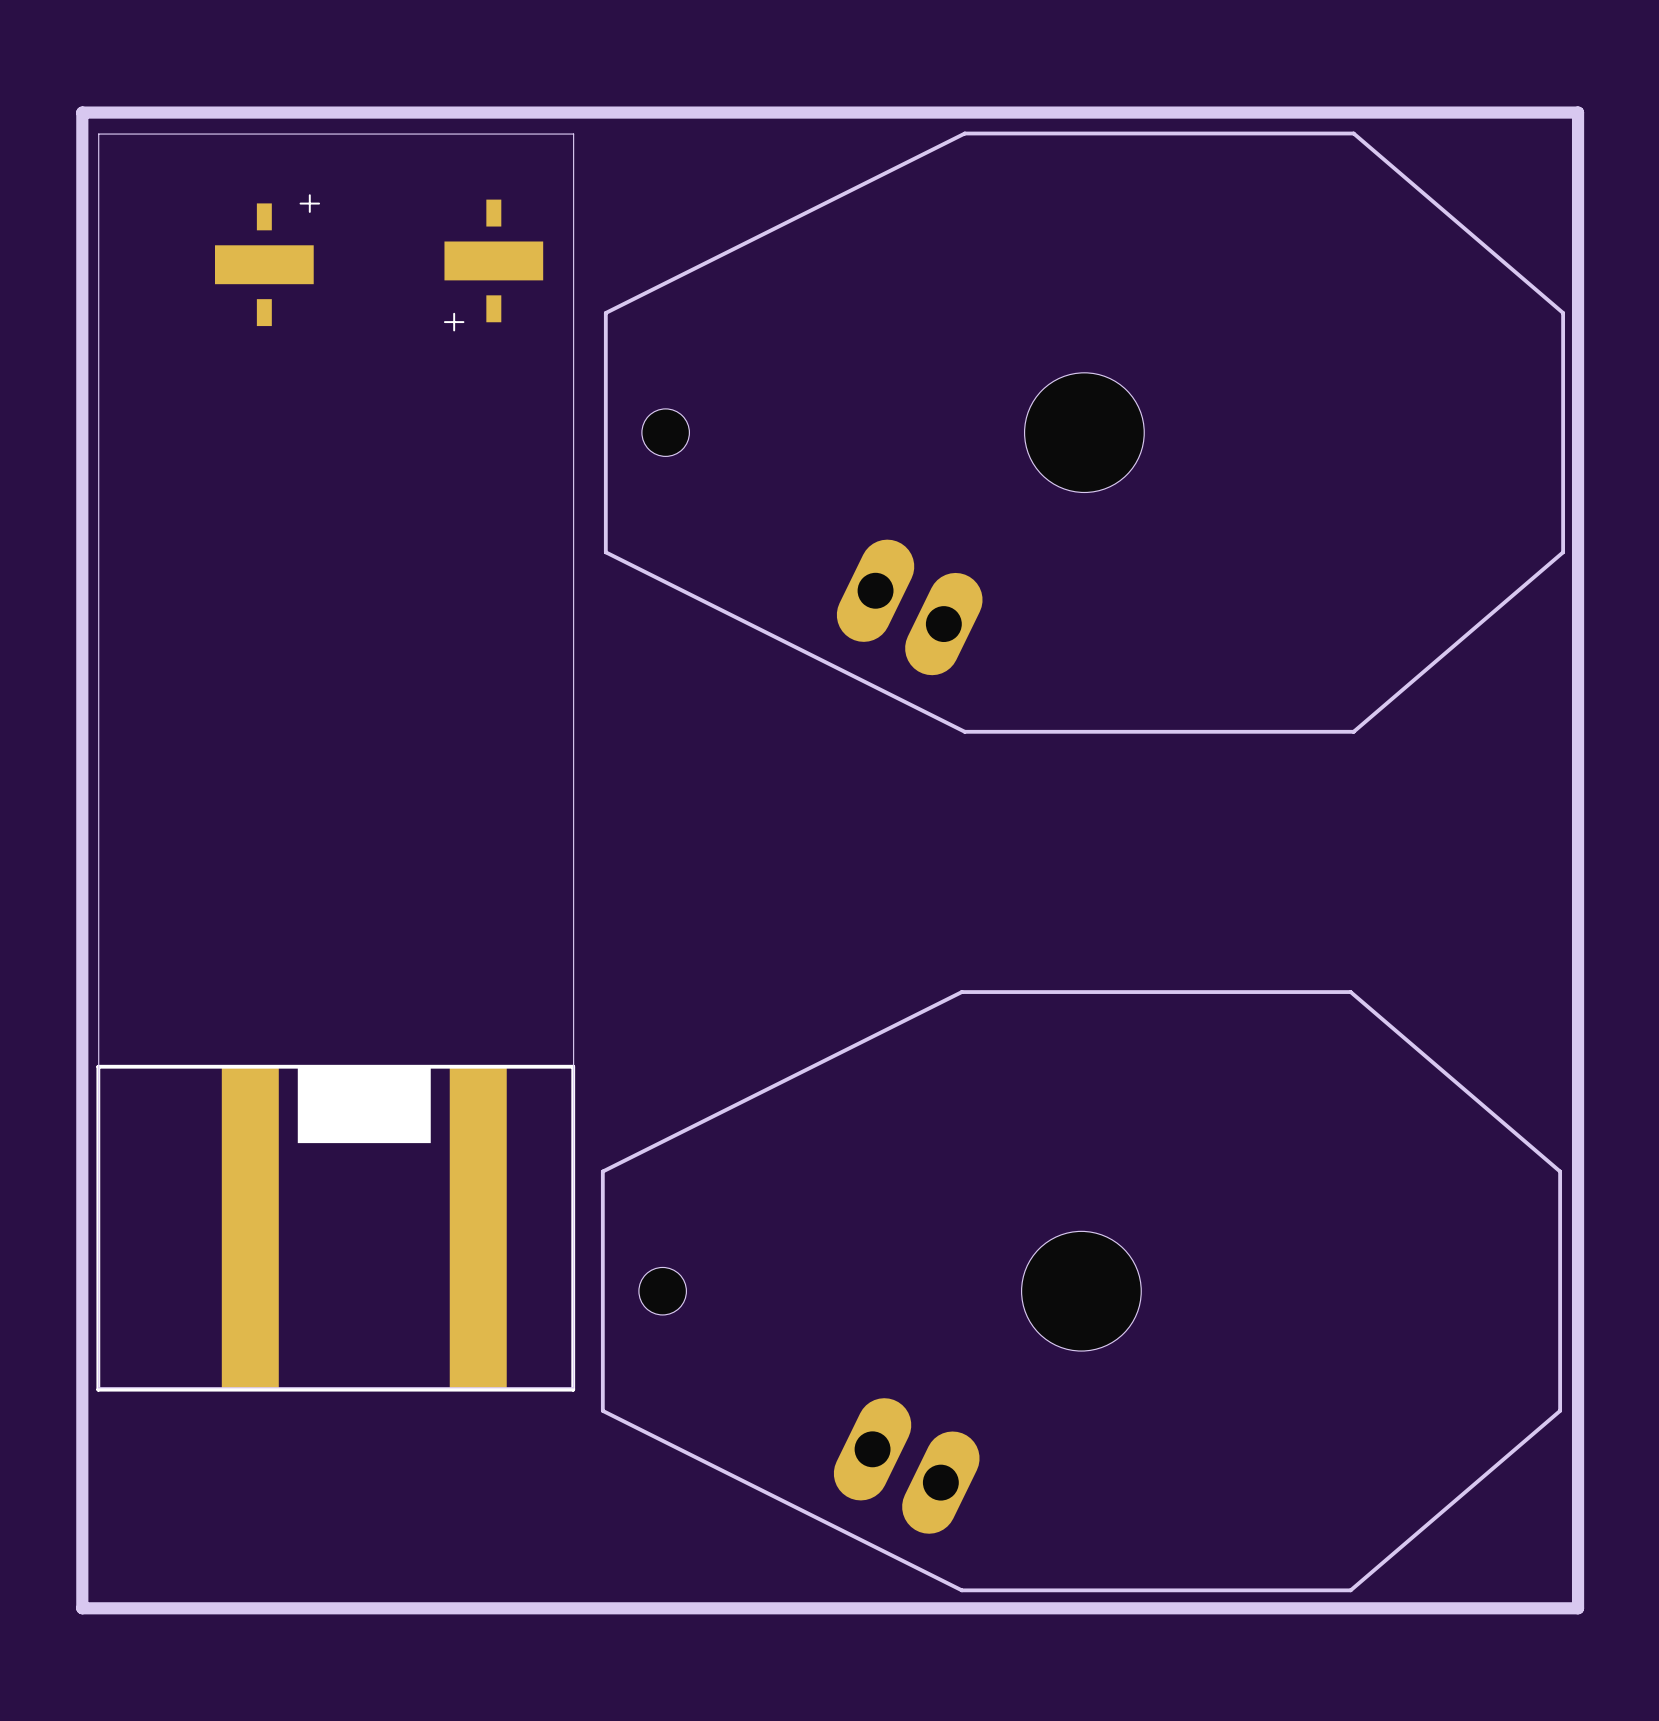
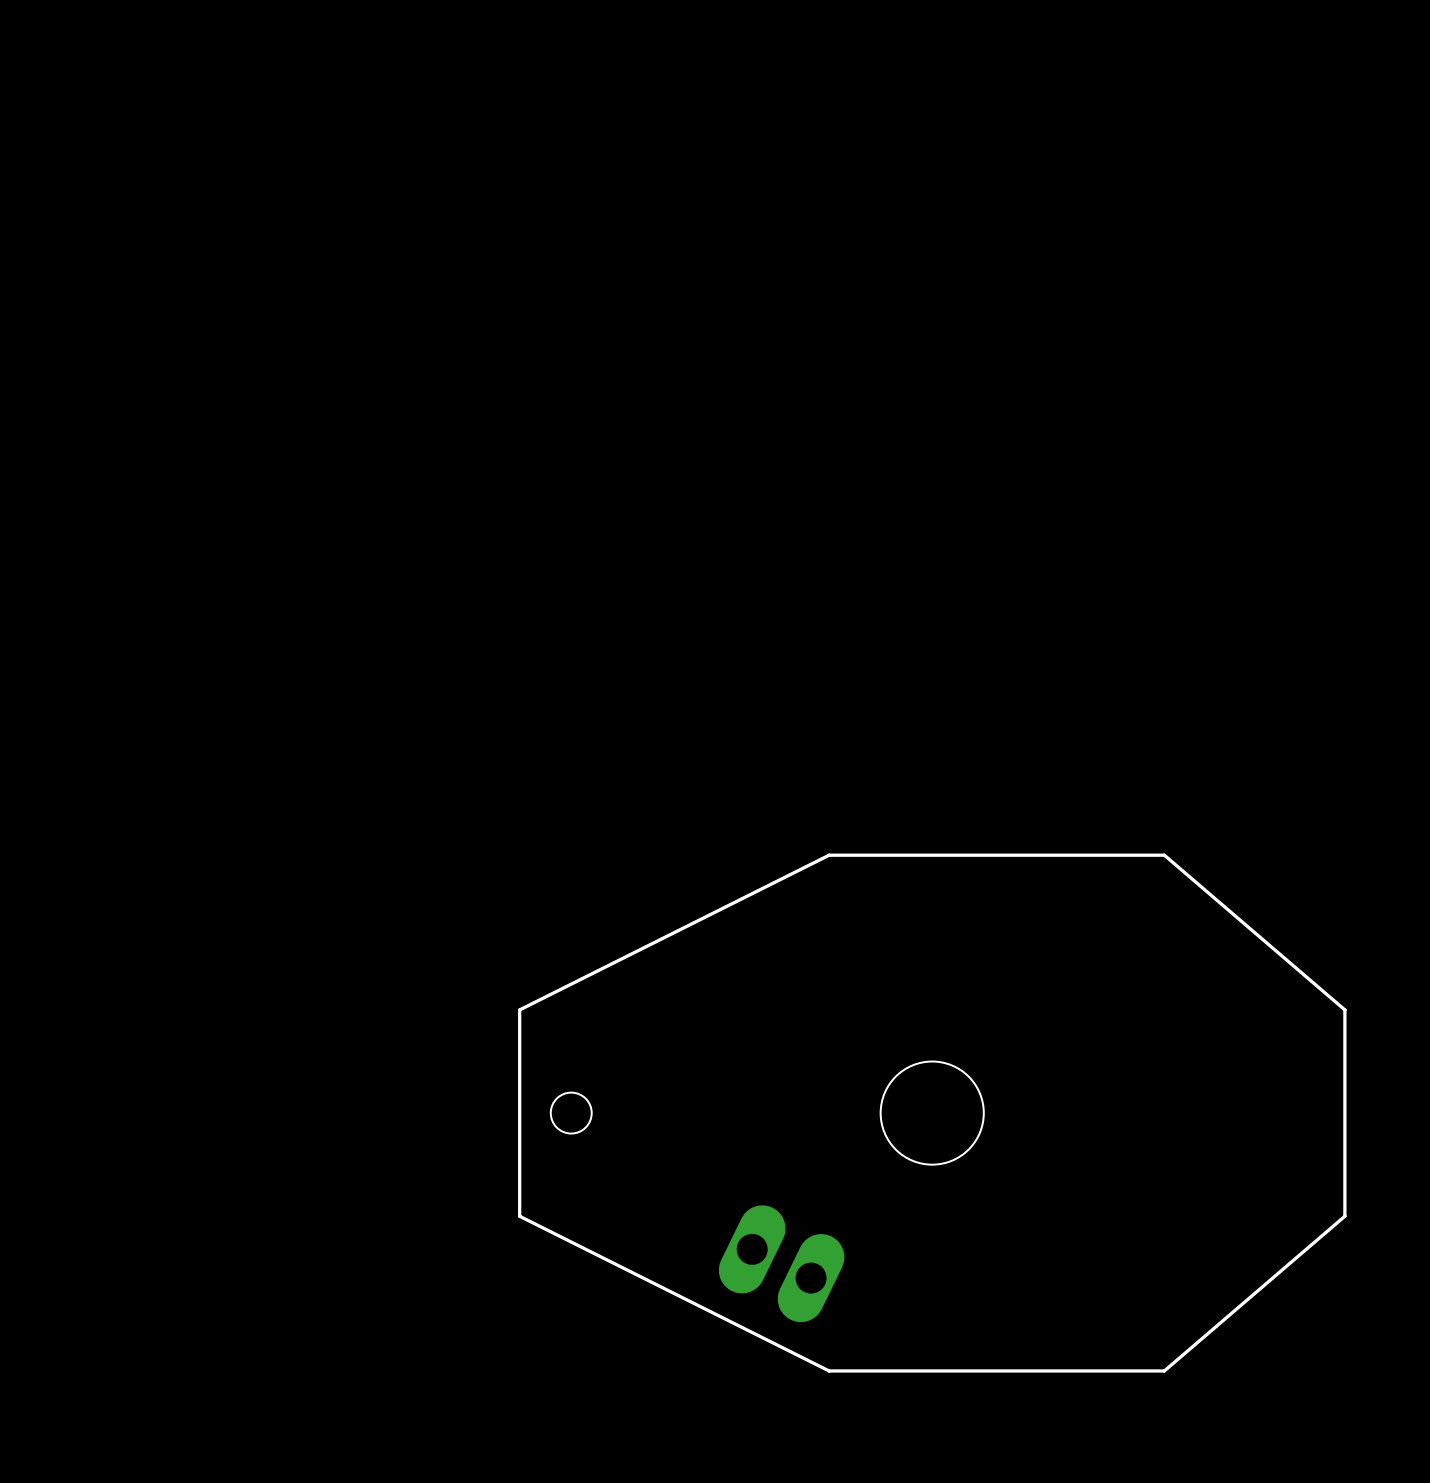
board edge: (1578, 112) (82, 112) (82, 1608) (1578, 1608) (1578, 112) -> none
board edge: (1353, 133) (1563, 312) (1563, 552) (1353, 731) (964, 731) (605, 552) (605, 312) (964, 133) (1353, 133) -> none
board edge: (573, 134) (98, 134) (98, 1387) (573, 1387) (573, 134) -> none
part: (493, 260) -> none
part: (264, 264) -> none
hole: (665, 432) -> none
hole: (1084, 432) -> none
part: (909, 607) -> none
part: (335, 1228) -> none

